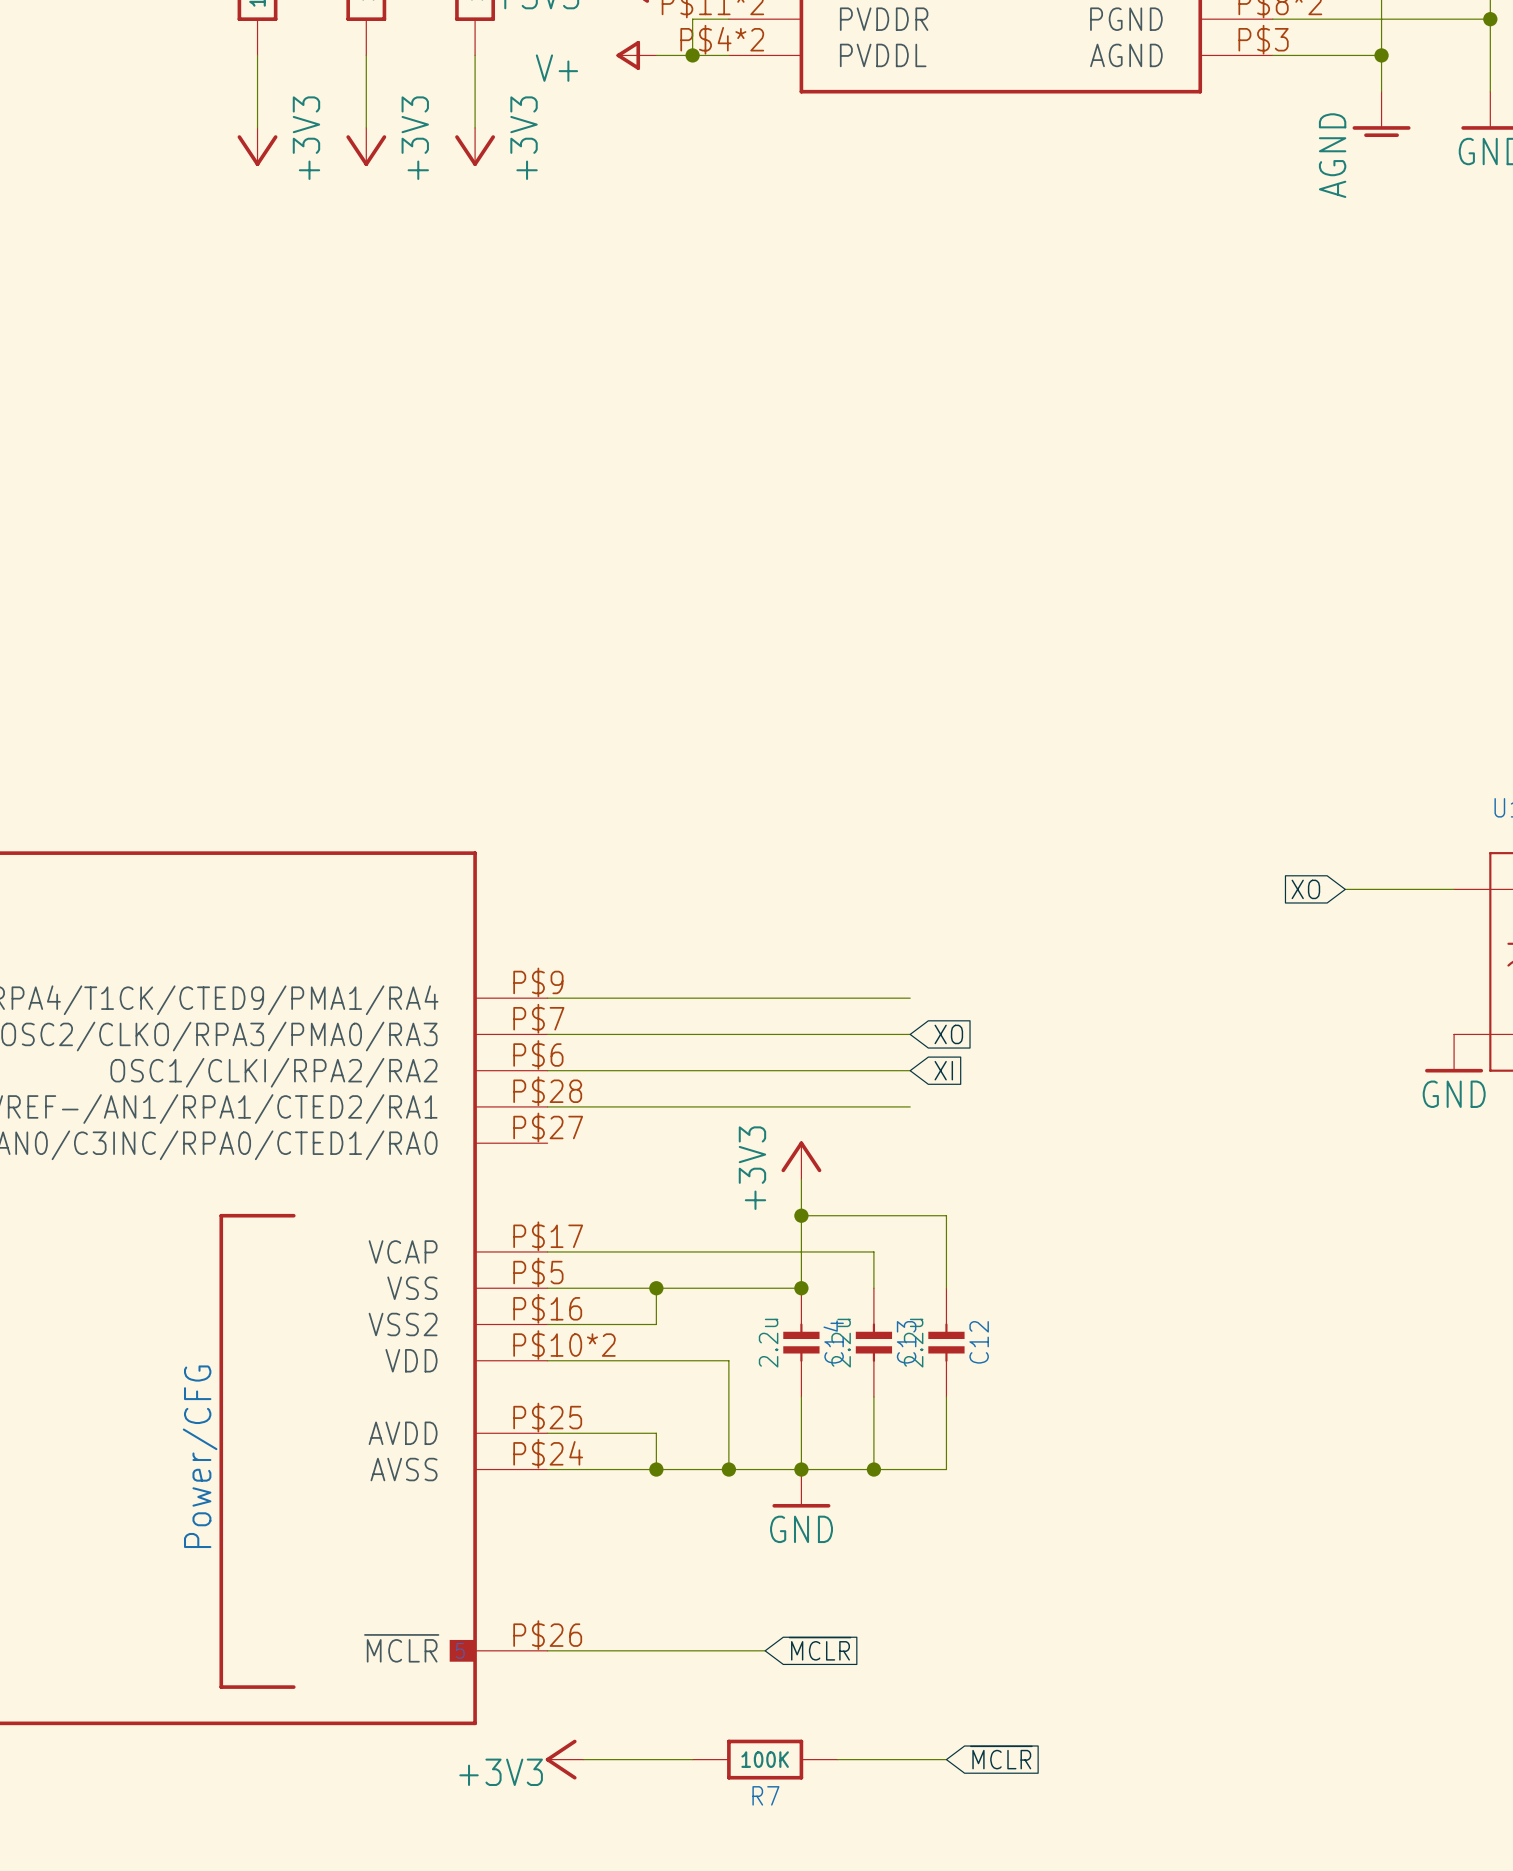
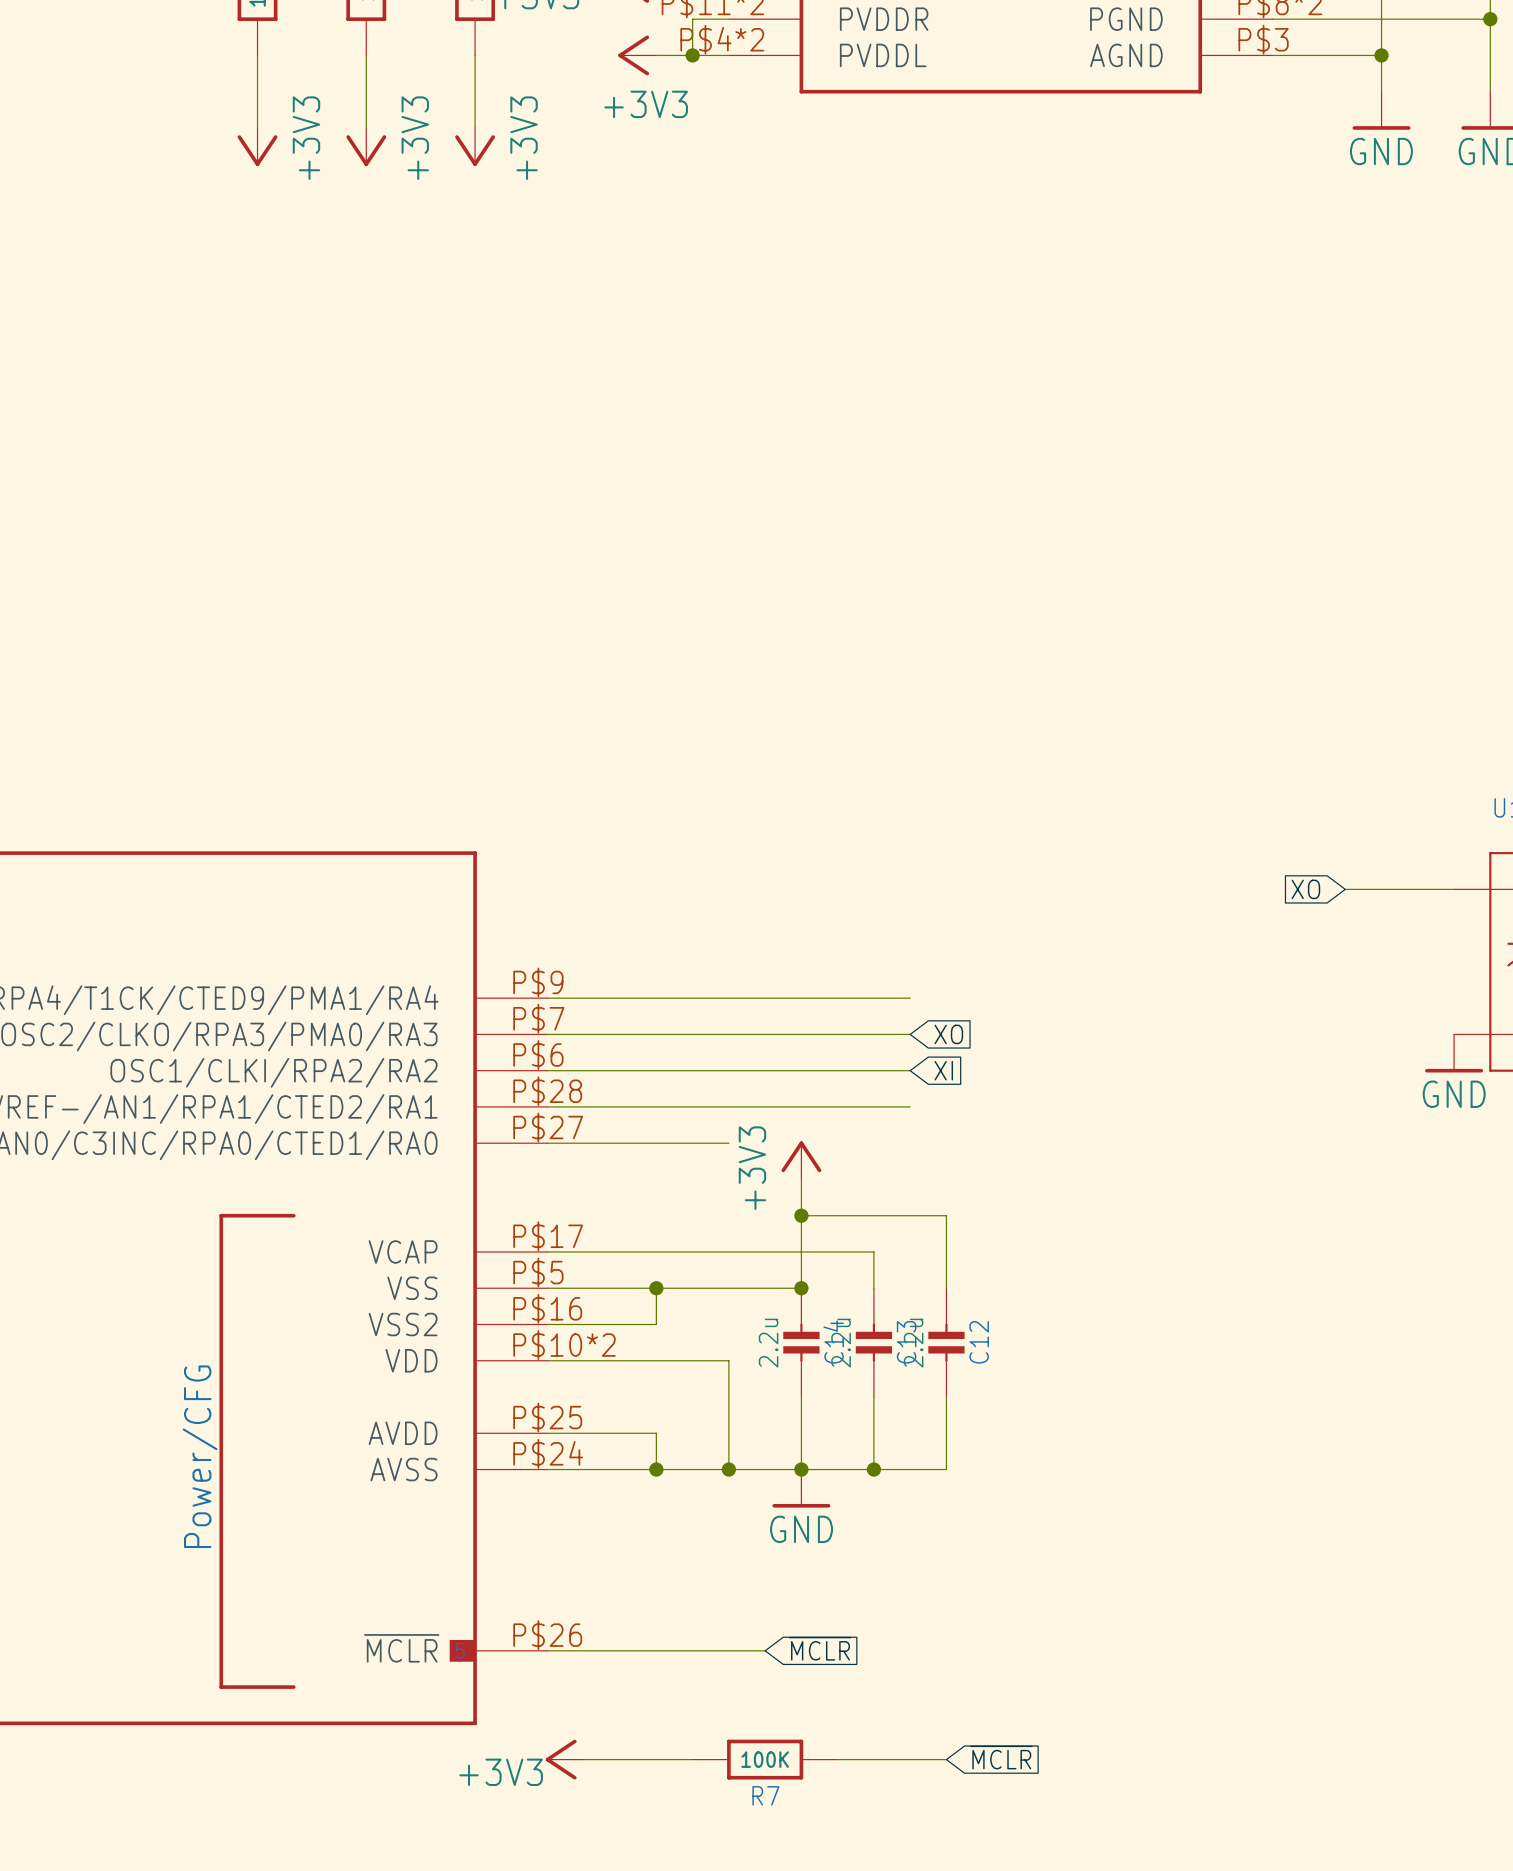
power symbol: V+ (636, 55) -> +3V3 (637, 55)
power symbol: AGND (1381, 114) -> GND (1381, 110)
wire: none -> (547, 1143) (728, 1143)

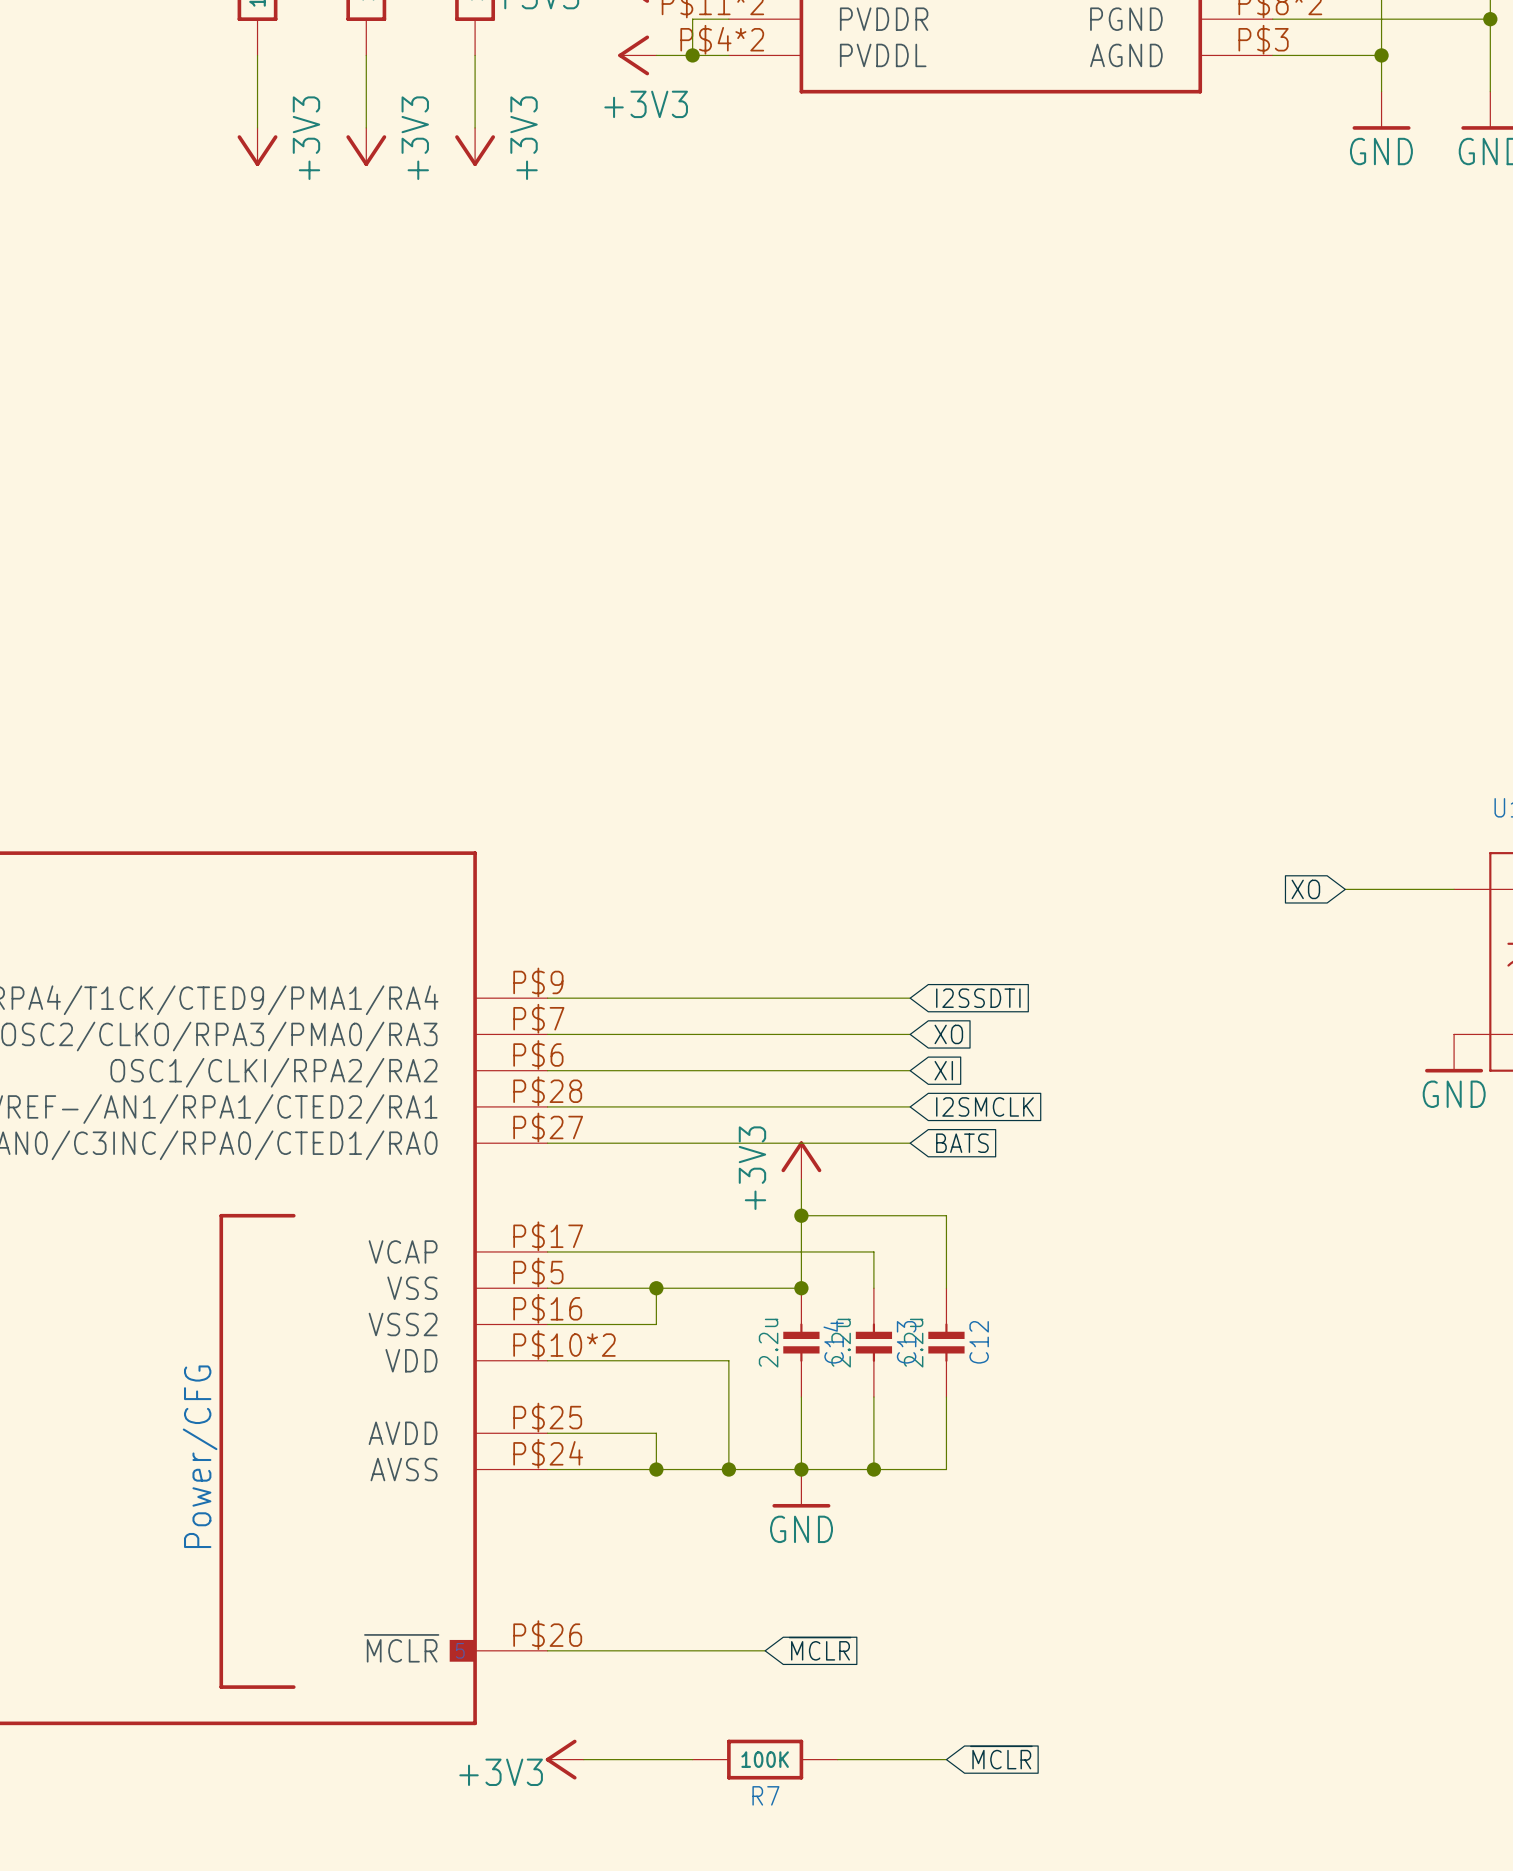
global label: none -> I2SSDTI (978, 998)
global label: none -> I2SMCLK (984, 1106)
wire: none -> (728, 1143) (910, 1143)
global label: none -> BATS (962, 1143)

